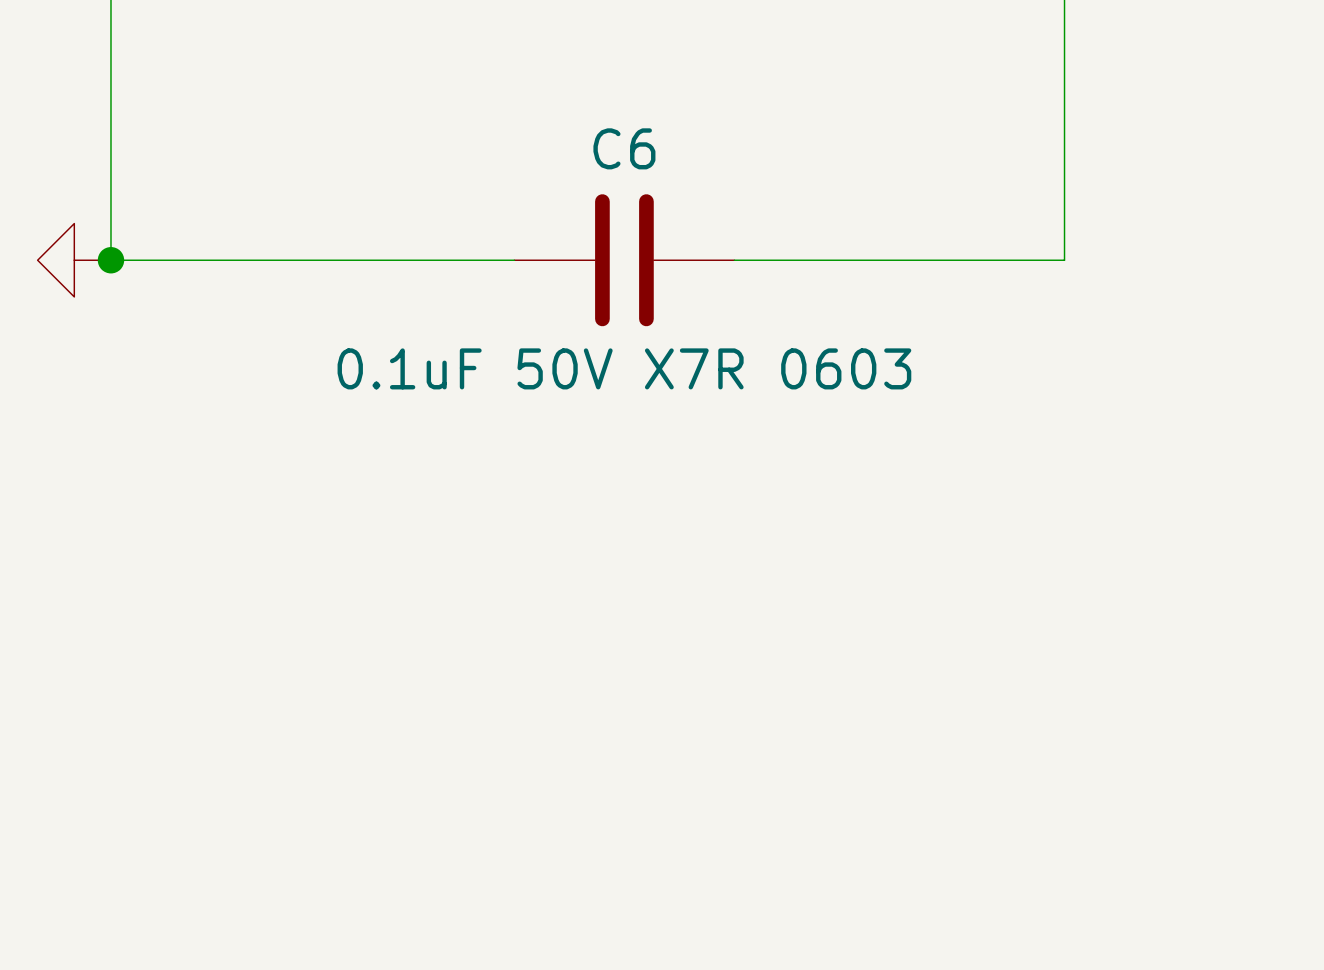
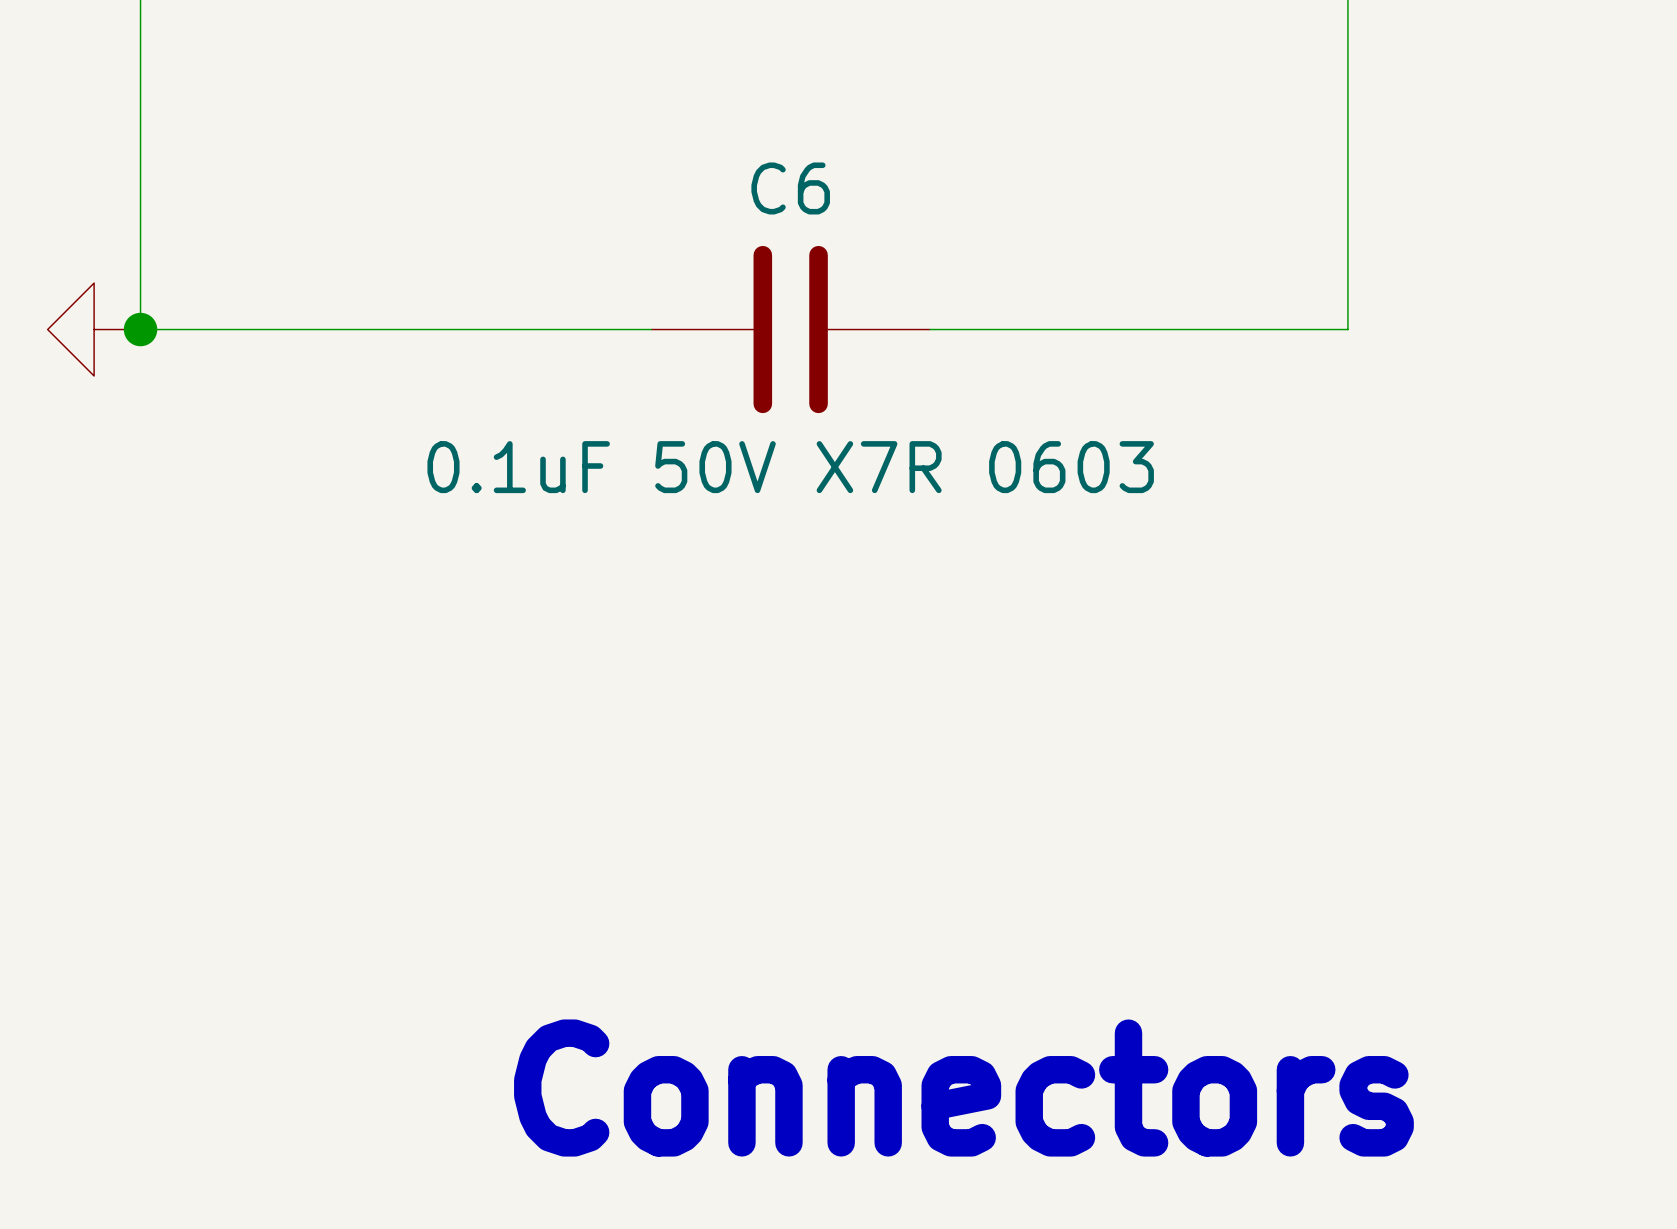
text: none -> Connectors (963, 1088)

